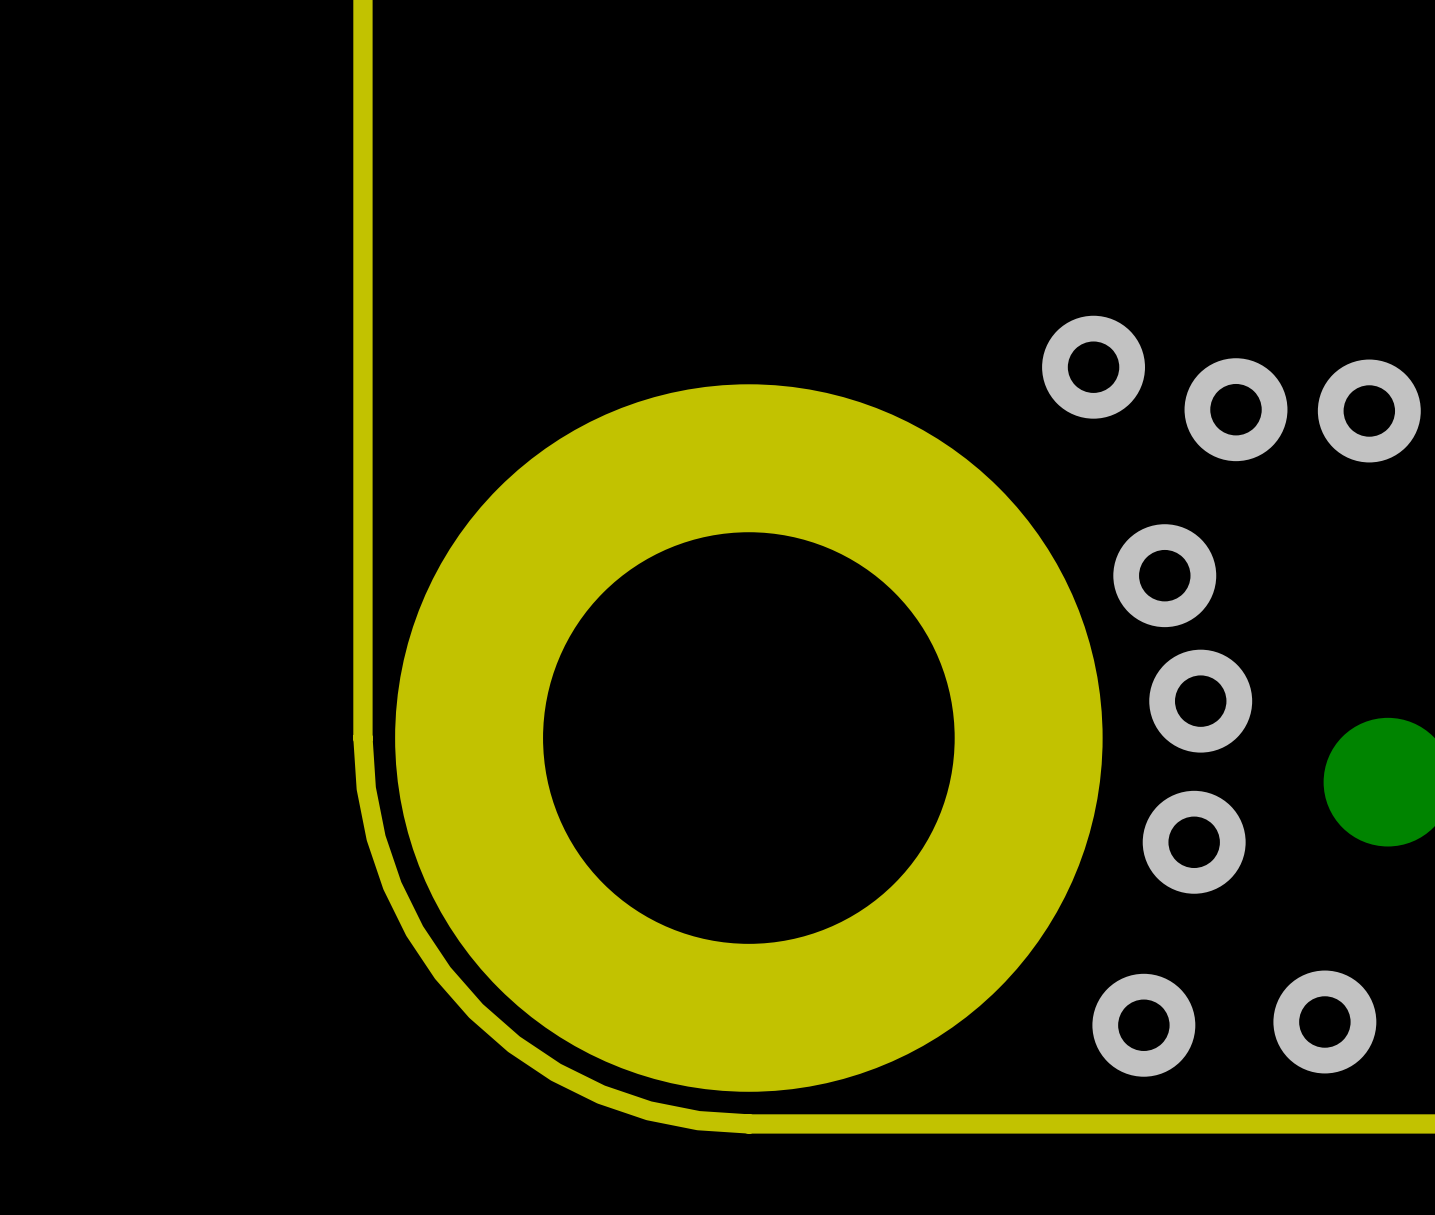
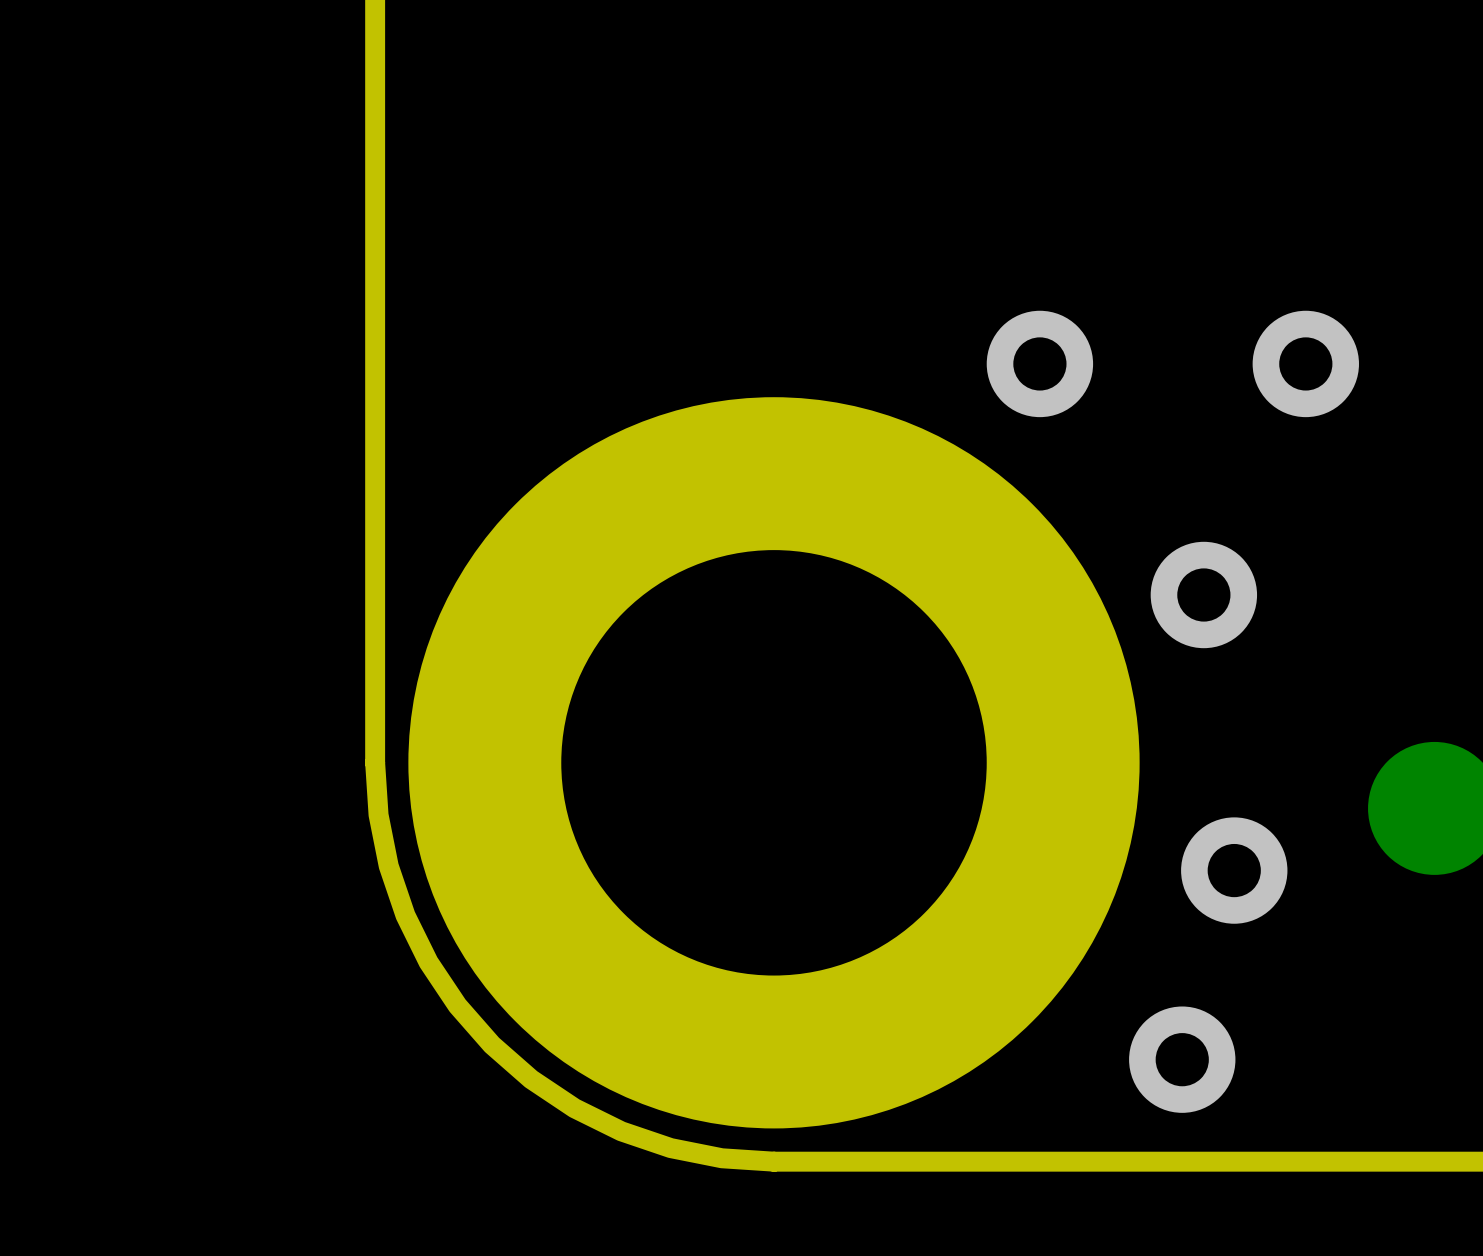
via position: (1093, 367) -> (1039, 363)
via position: (1236, 409) -> (1305, 363)
via: (1369, 410) -> none
via: (1200, 701) -> none
via: (1324, 1021) -> none

